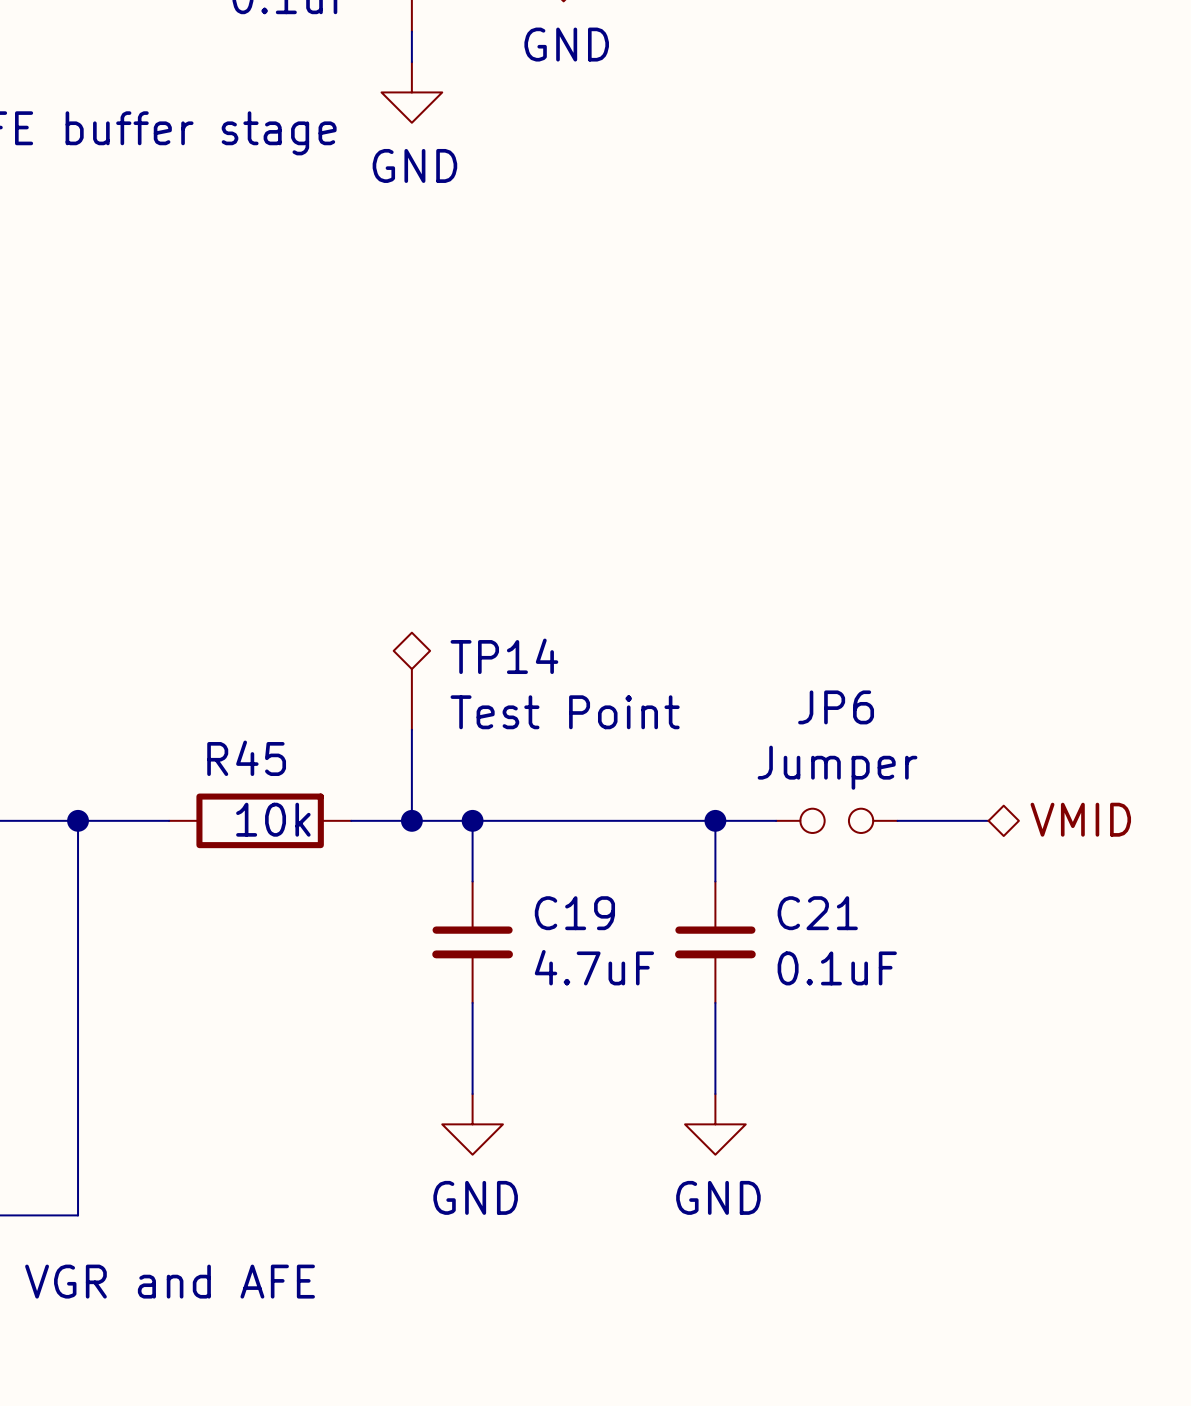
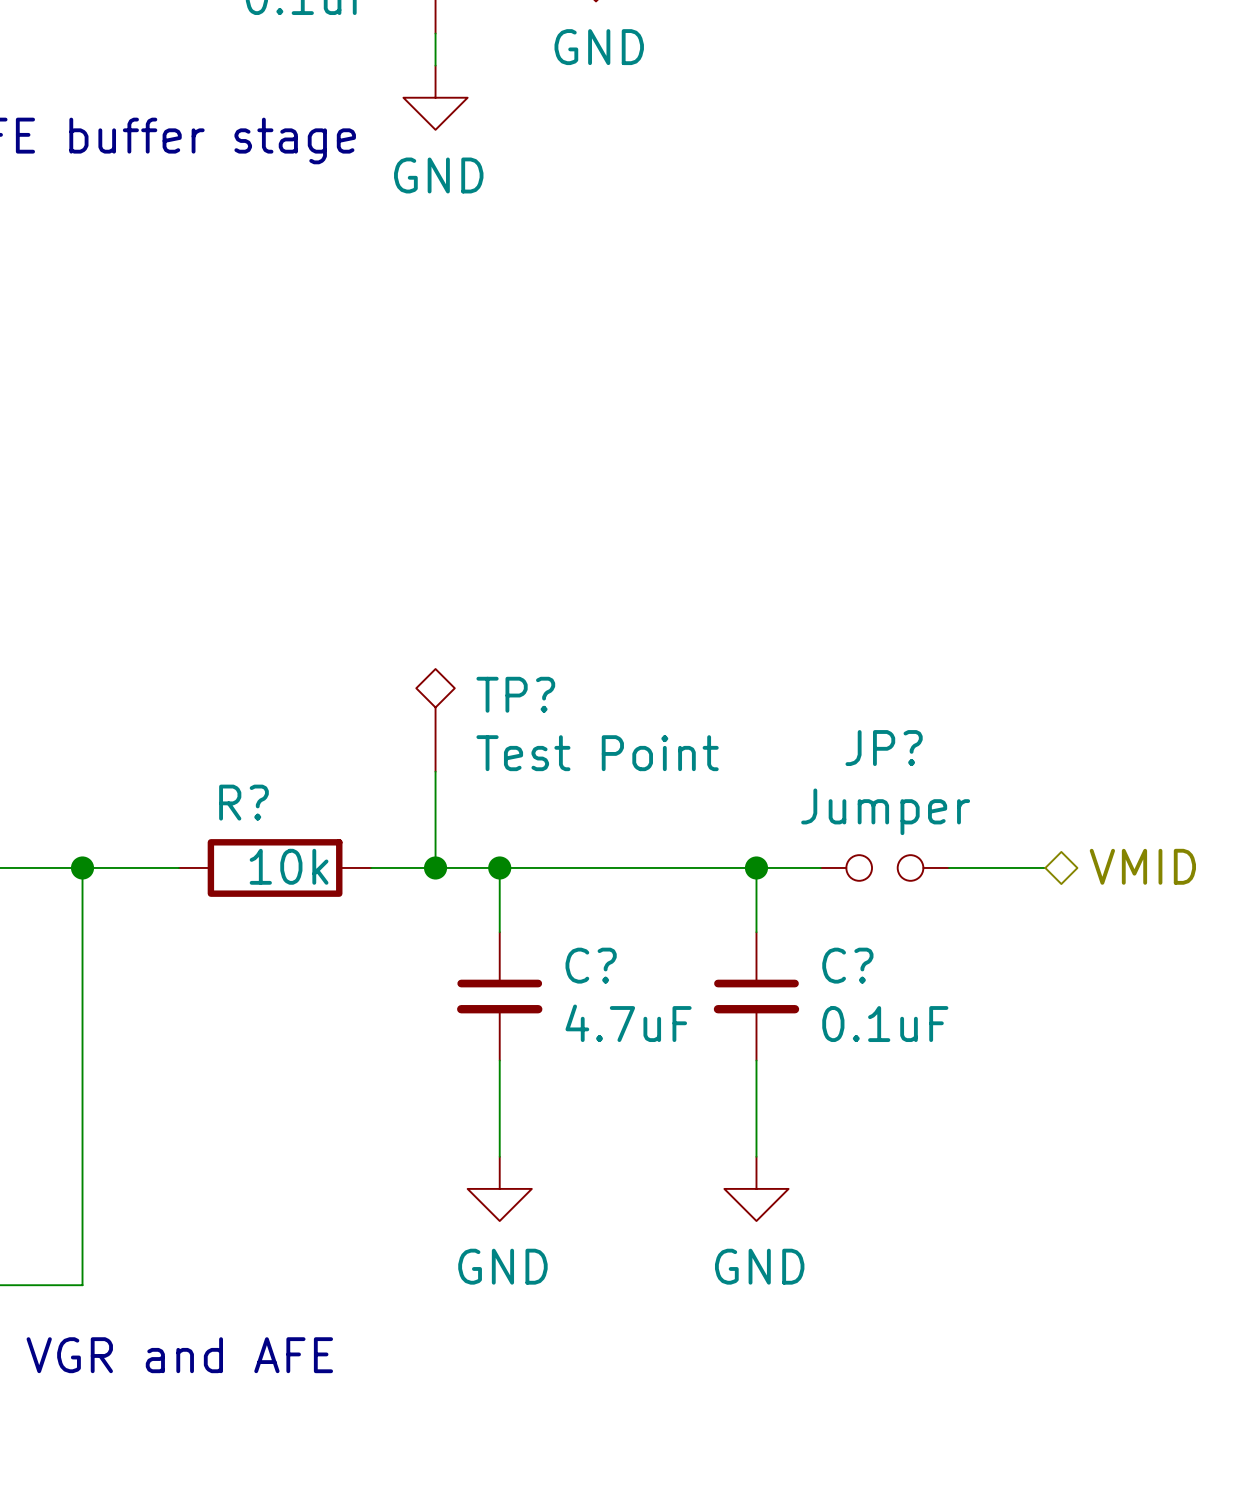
TP14 name: TP14 (504, 656) -> TP? (515, 694)
JP6 name: JP6 (836, 707) -> JP? (884, 748)
R45 name: R45 (246, 758) -> R? (243, 802)
C19 name: C19 (574, 913) -> C? (591, 965)
C21 name: C21 (817, 913) -> C? (847, 965)

